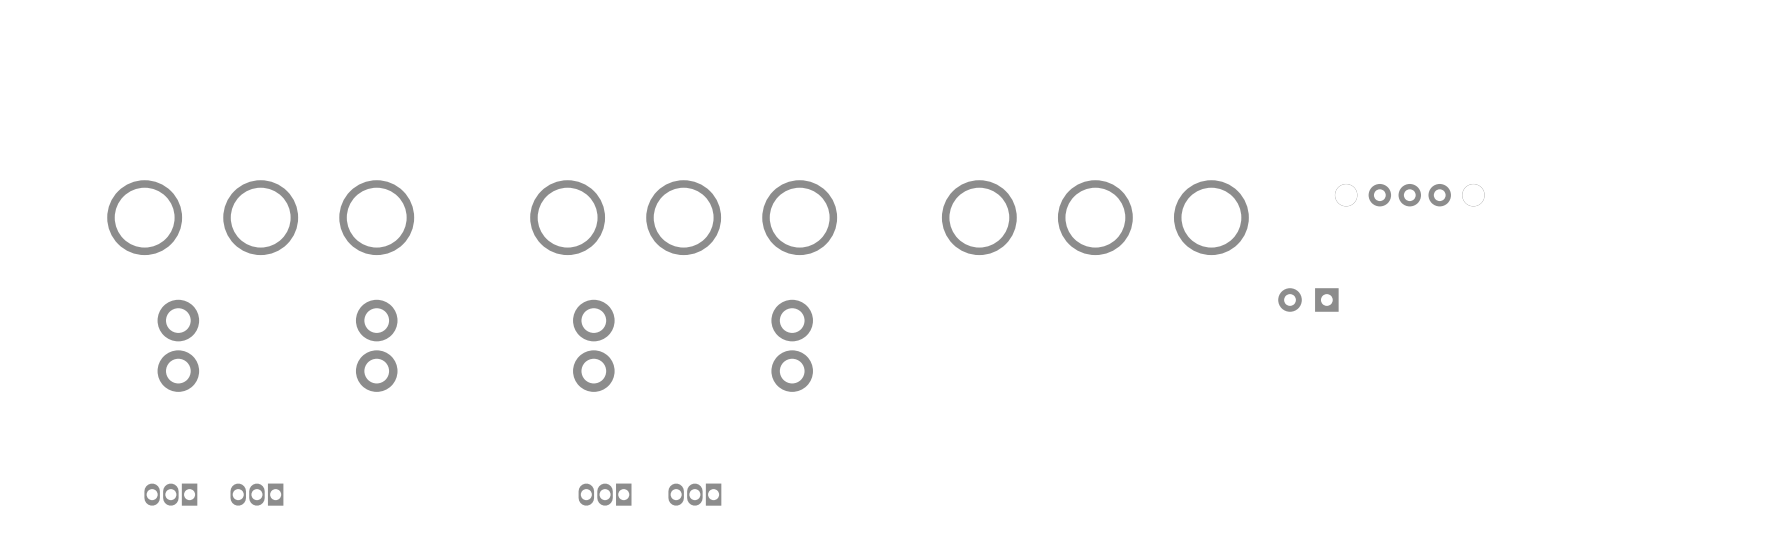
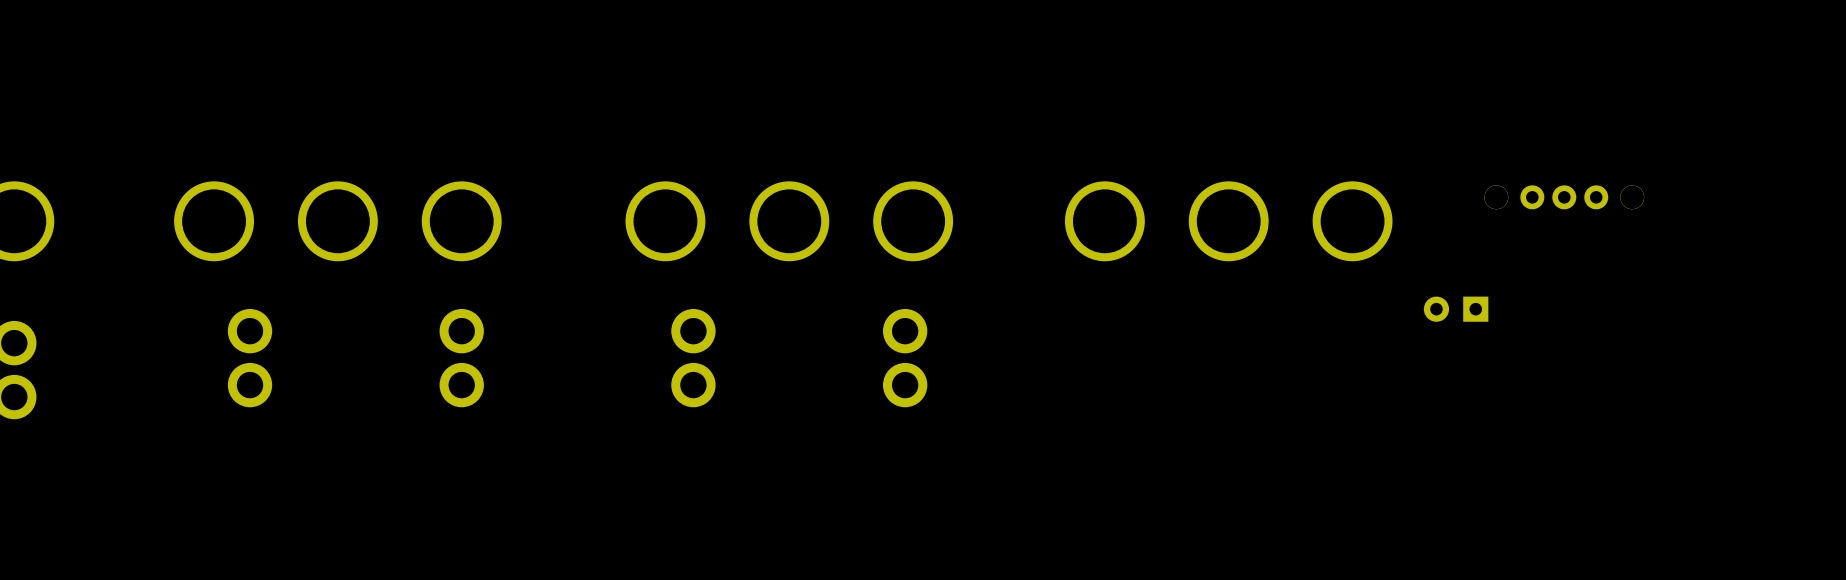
part: (170, 494) -> none
part: (256, 494) -> none
part: (605, 494) -> none
part: (694, 494) -> none

